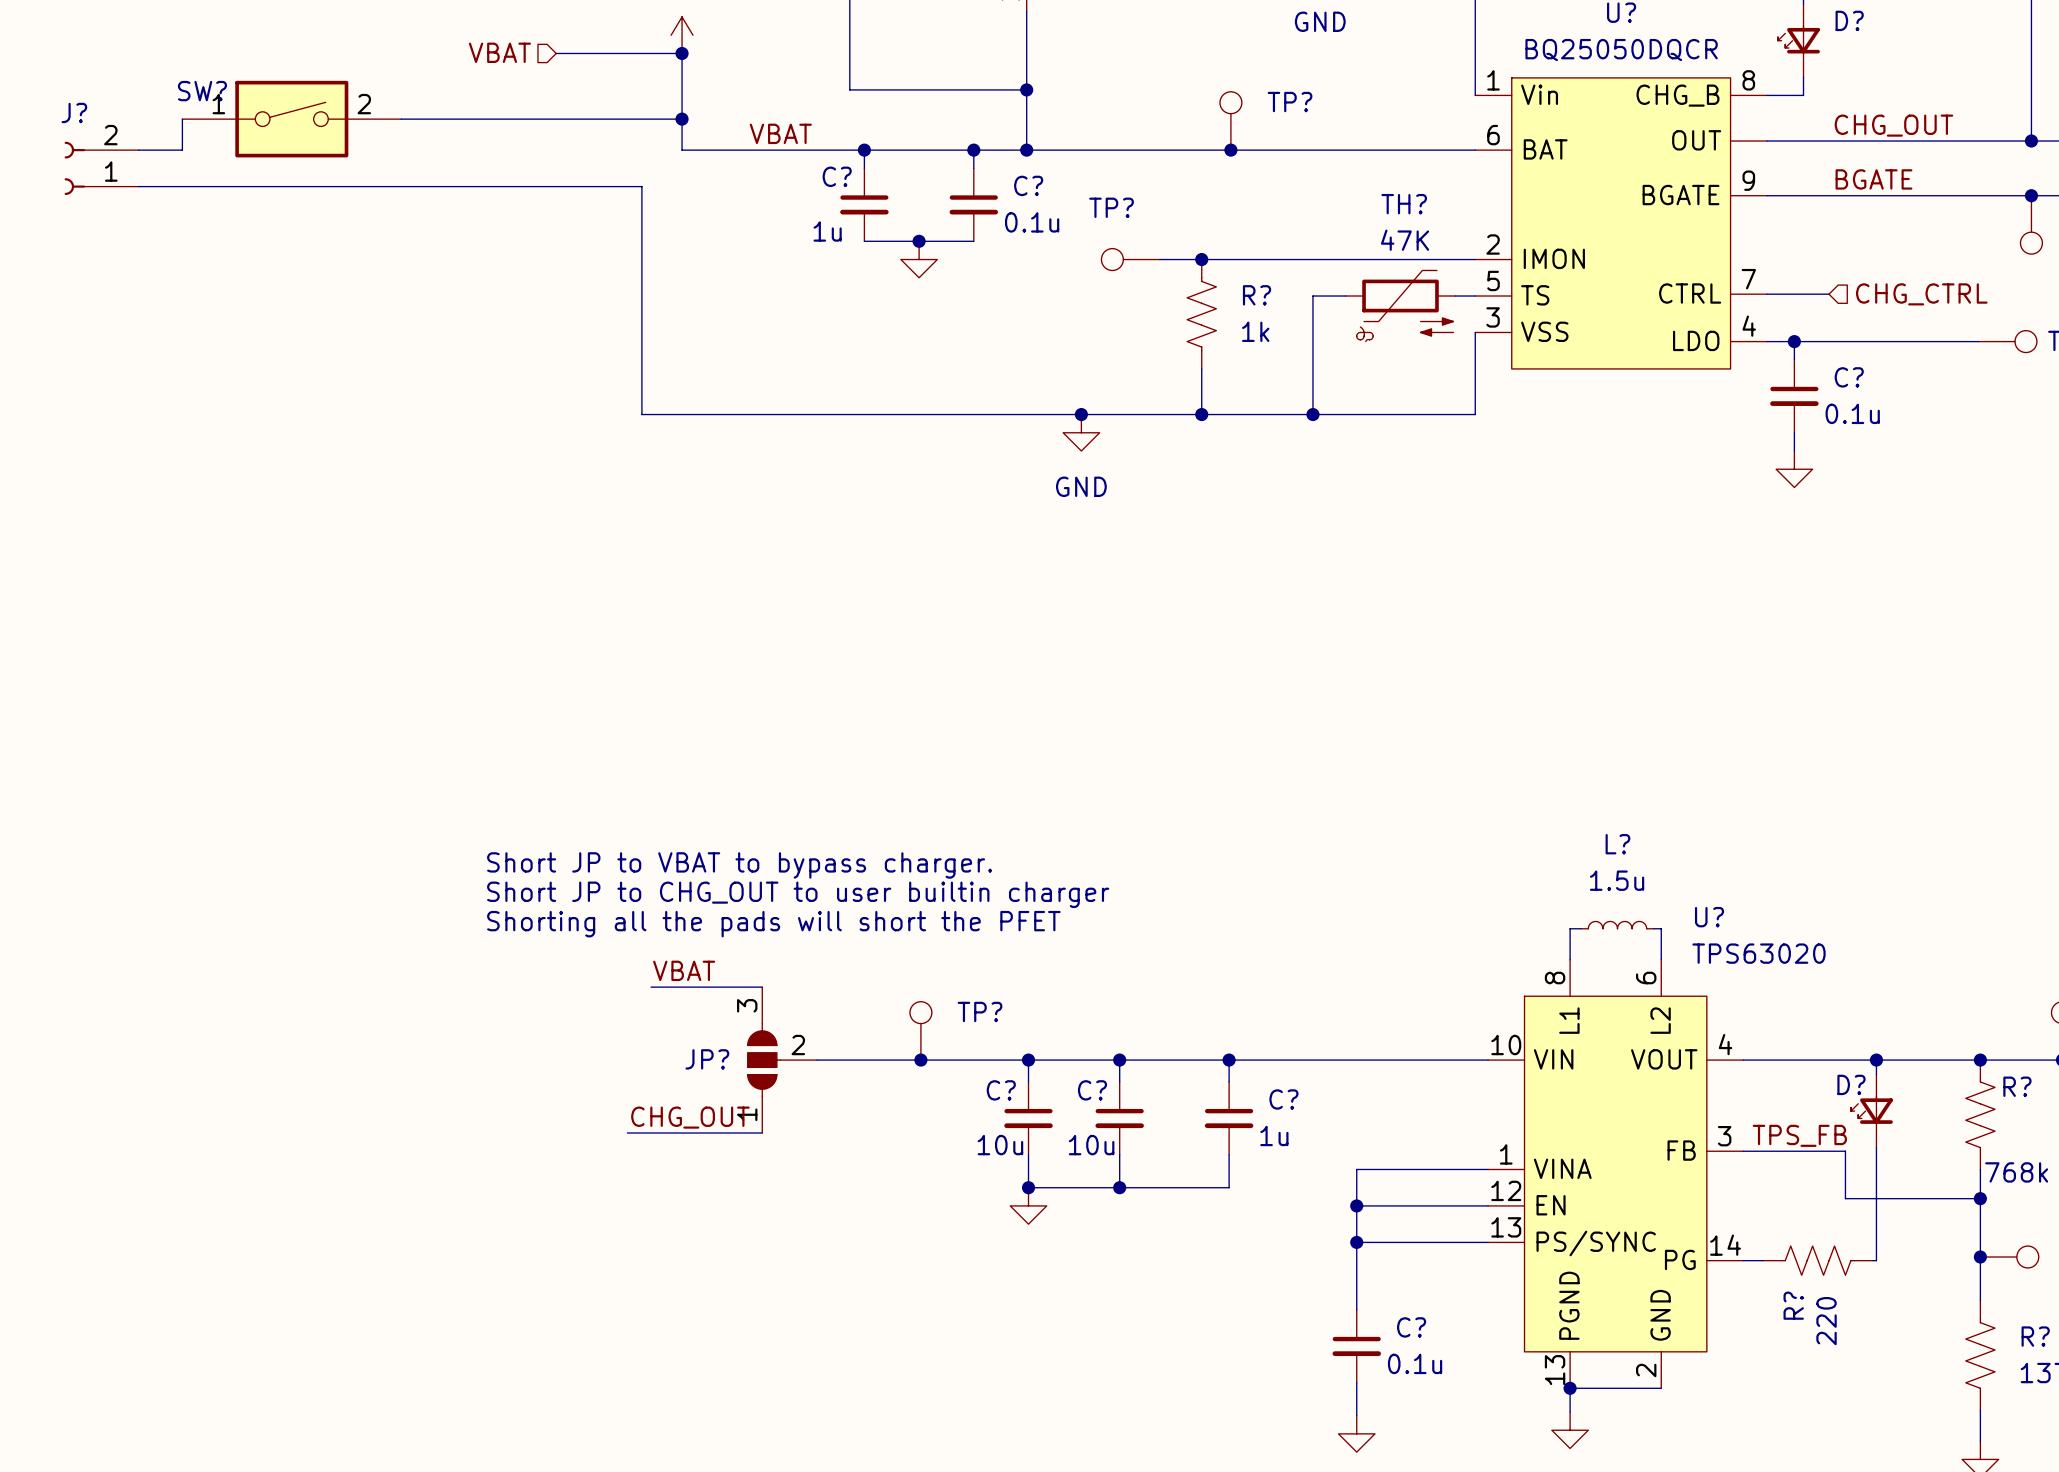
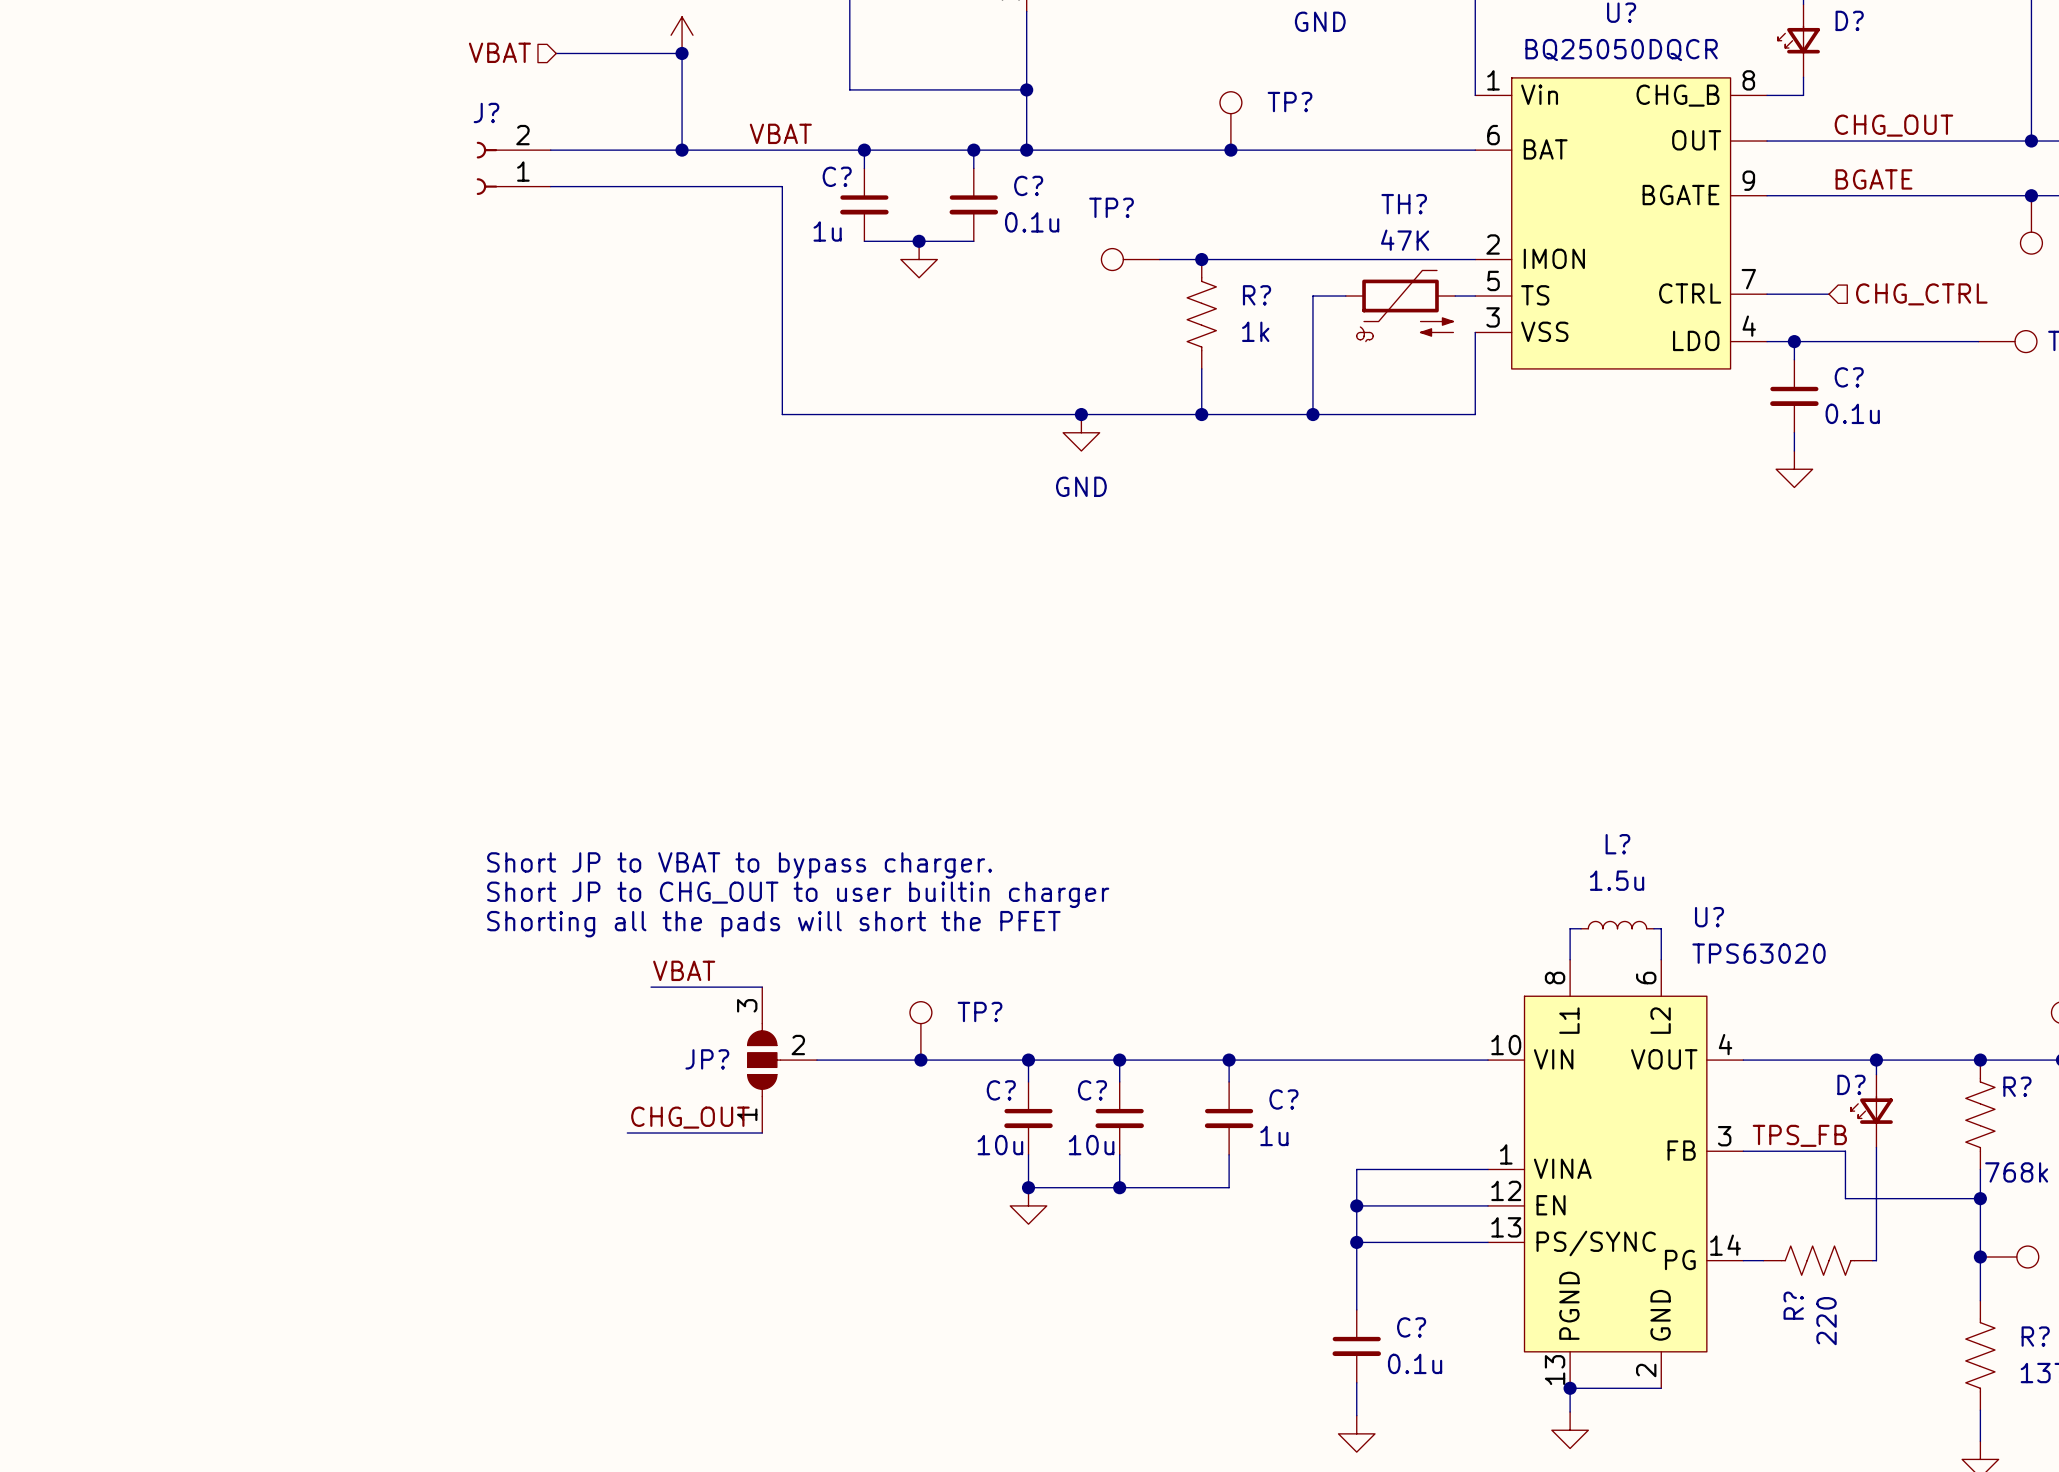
wire: (182, 119) (182, 150) (138, 150) -> none
SW?: (291, 119) -> none
wire: (401, 119) (682, 119) -> none
junction position: (682, 119) -> (682, 150)
wire: none -> (550, 150) (682, 150)
J?: (101, 168) -> none
J?: none -> (513, 168)
wire: (138, 186) (550, 186) -> none
wire: (641, 186) (641, 414) (782, 414) -> (641, 186) (782, 186) (782, 414)

